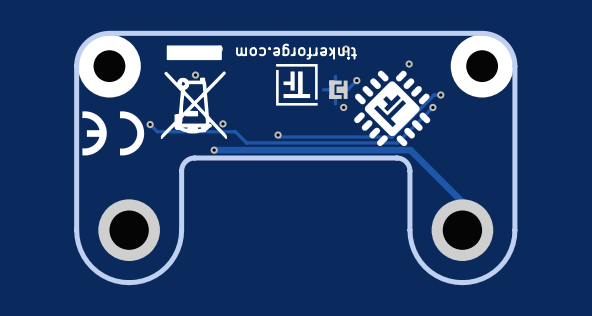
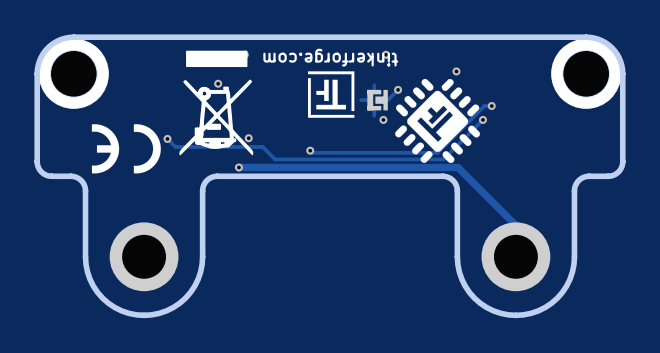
board edge: (109, 33) (98, 35) (89, 40) (81, 48) (77, 58) (76, 171) -> (122, 37) (73, 37) (61, 39) (45, 50) (38, 65) (38, 166) (41, 171) (48, 175) (77, 177) (83, 183) (85, 190)
board edge: (482, 33) (492, 35) (502, 40) (509, 48) (514, 58) (514, 171) -> (537, 37) (586, 37) (598, 39) (612, 47) (621, 65) (621, 166) (618, 171) (611, 175) (582, 177) (576, 183) (574, 190)
part: none -> (73, 73)
part: (109, 66) -> none
part: (482, 66) -> none
part: none -> (586, 73)

